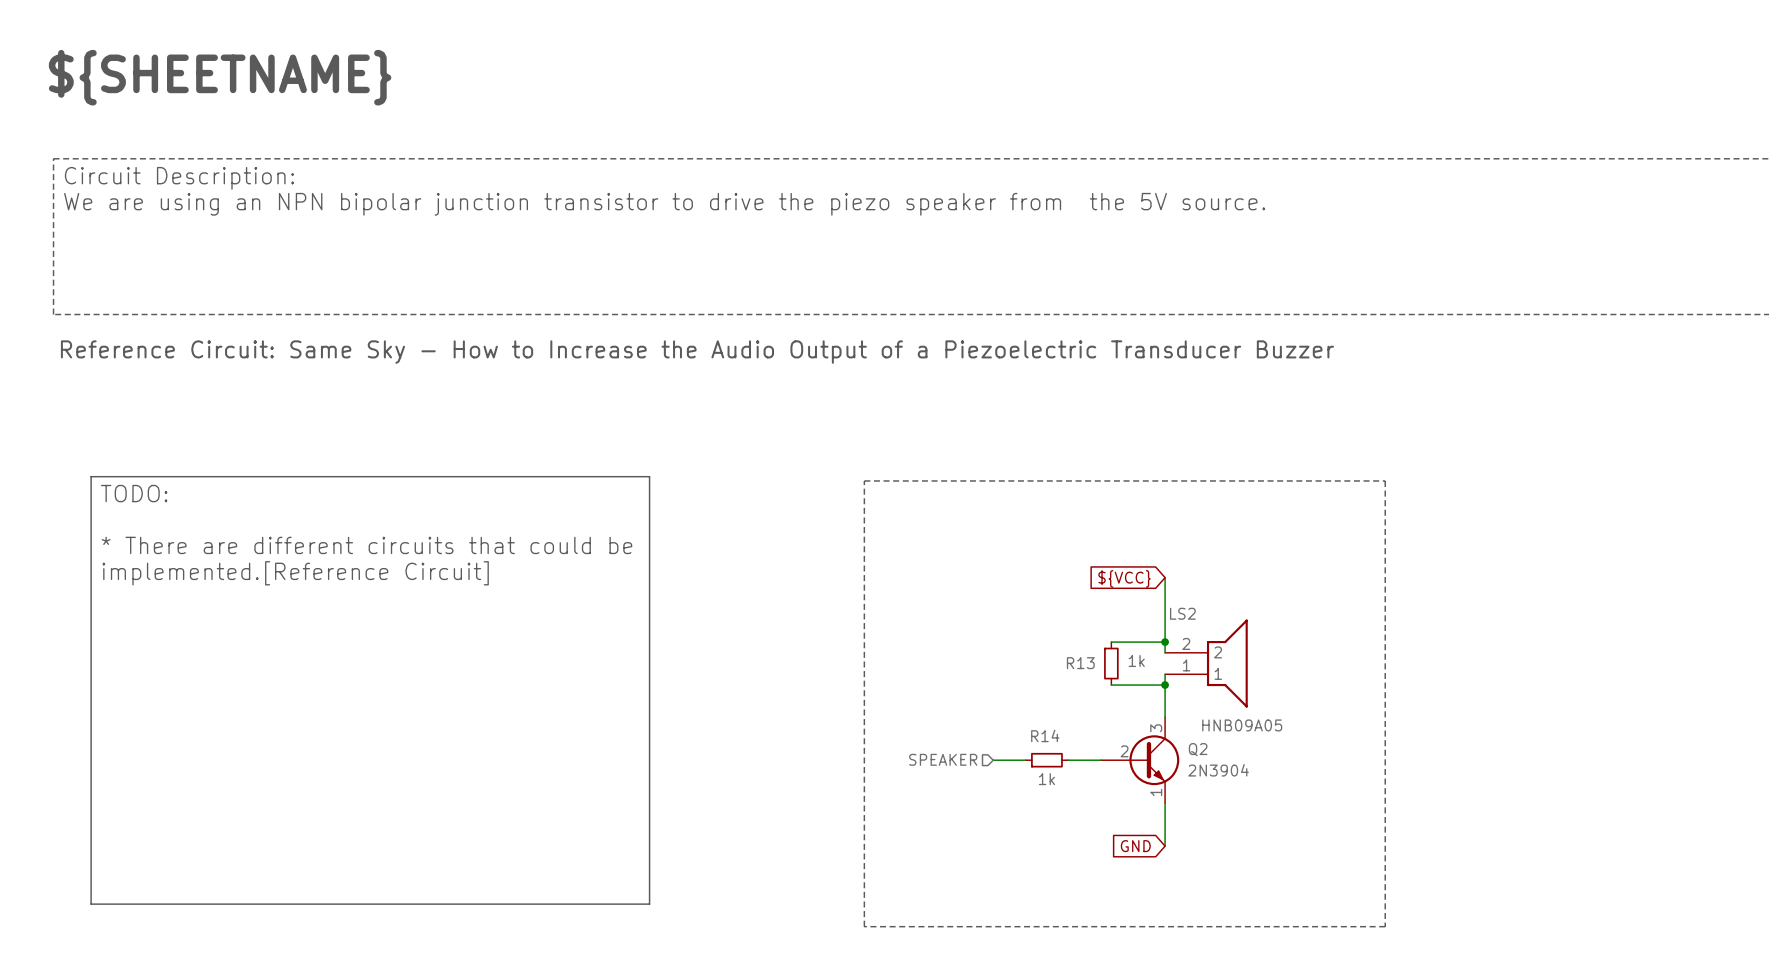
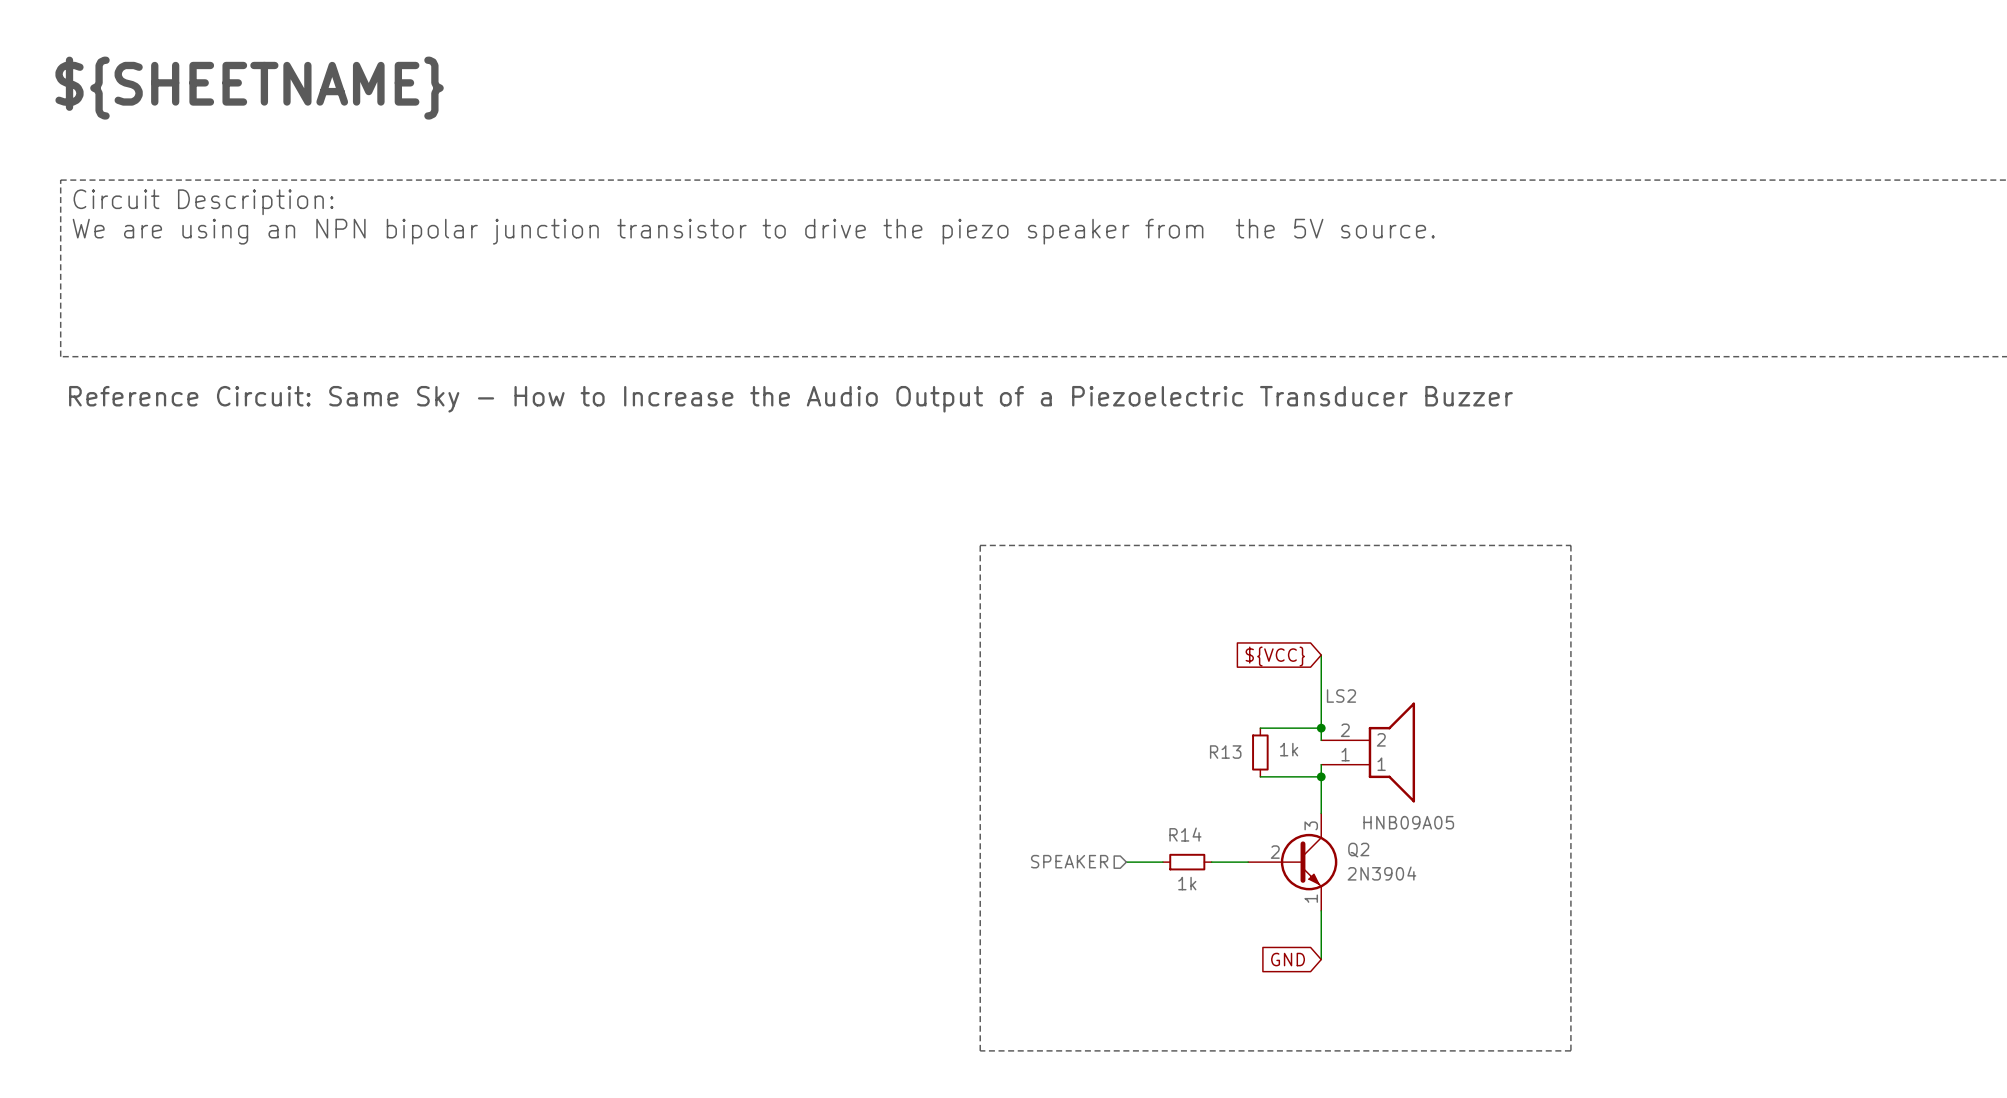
line: (91, 476) (649, 476) (649, 904) (91, 904) (91, 476) -> none
text: TODO: (134, 493) -> none
text: * There are different circuits that could be (366, 545) -> none
text: implemented.[Reference Circuit] (295, 573) -> none

